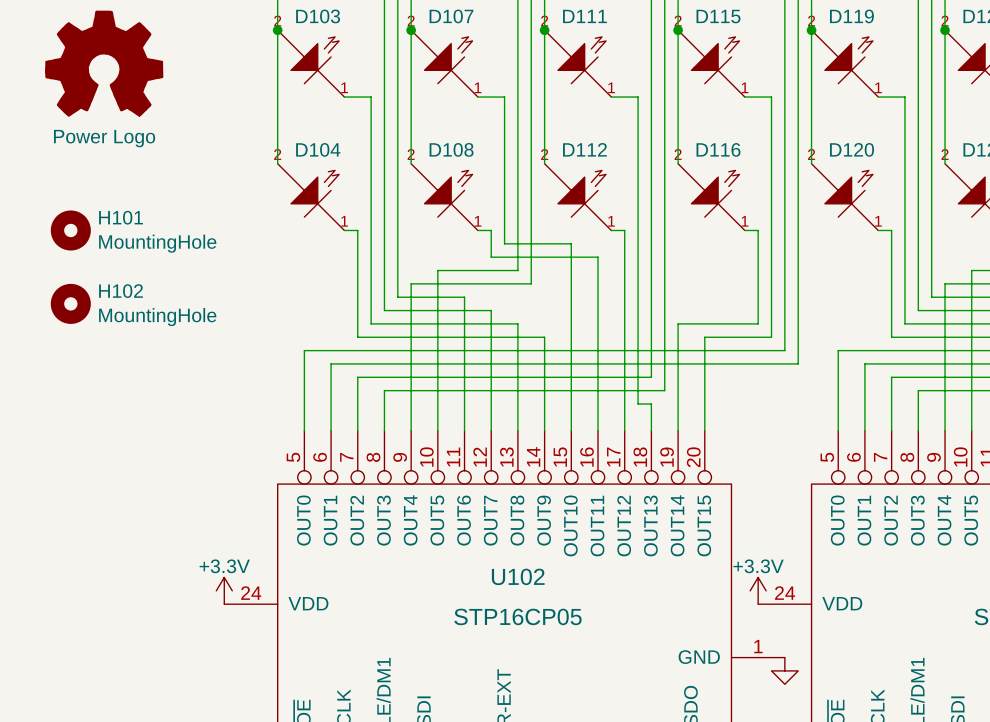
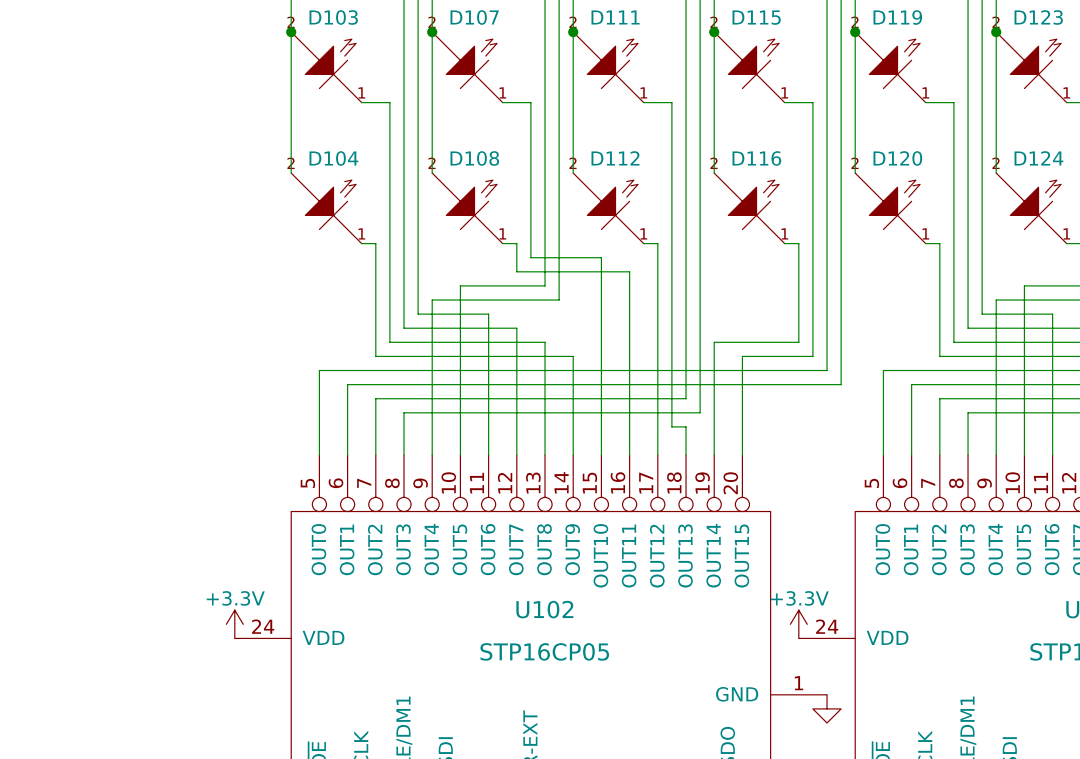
part: Power Logo (104, 63) -> none
H101: MountingHole (70, 230) -> none
H102: MountingHole (70, 303) -> none

